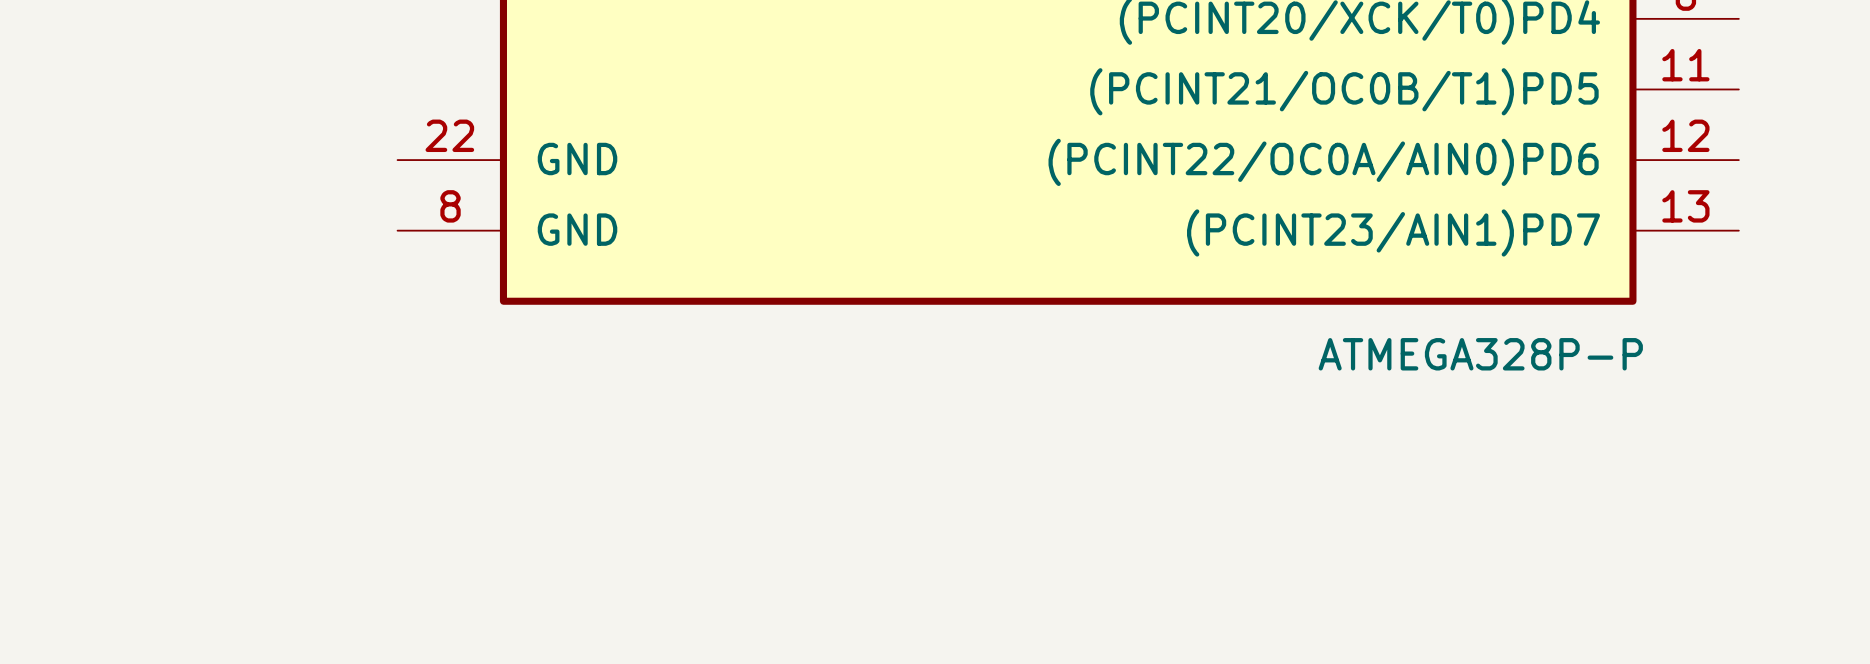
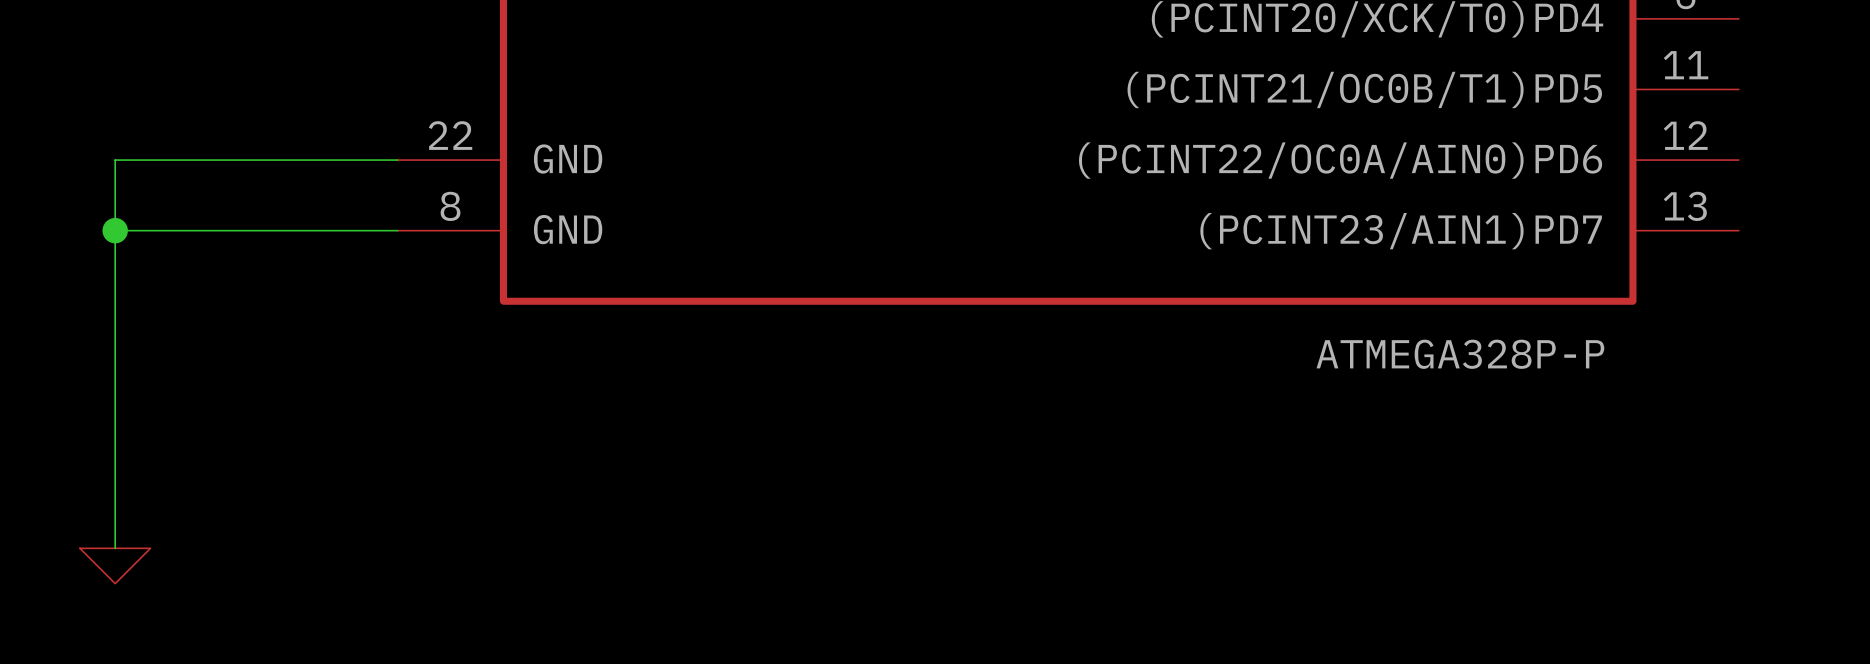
wire: none -> (397, 160) (115, 160) (115, 548)
wire: none -> (115, 230) (397, 230)
junction: none -> (115, 230)
power symbol: none -> (115, 565)

